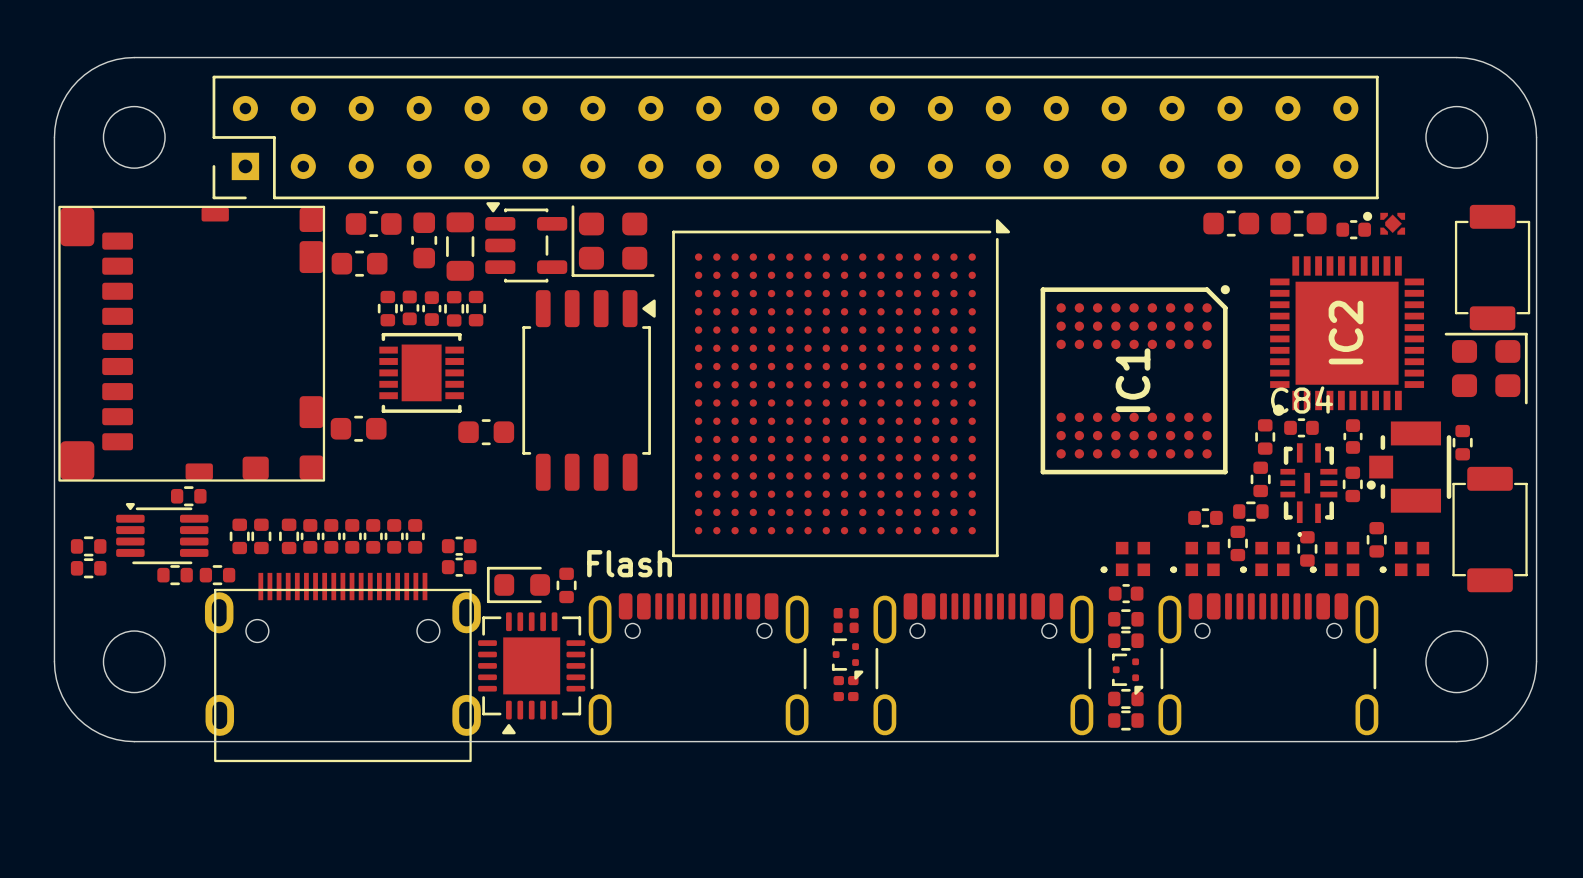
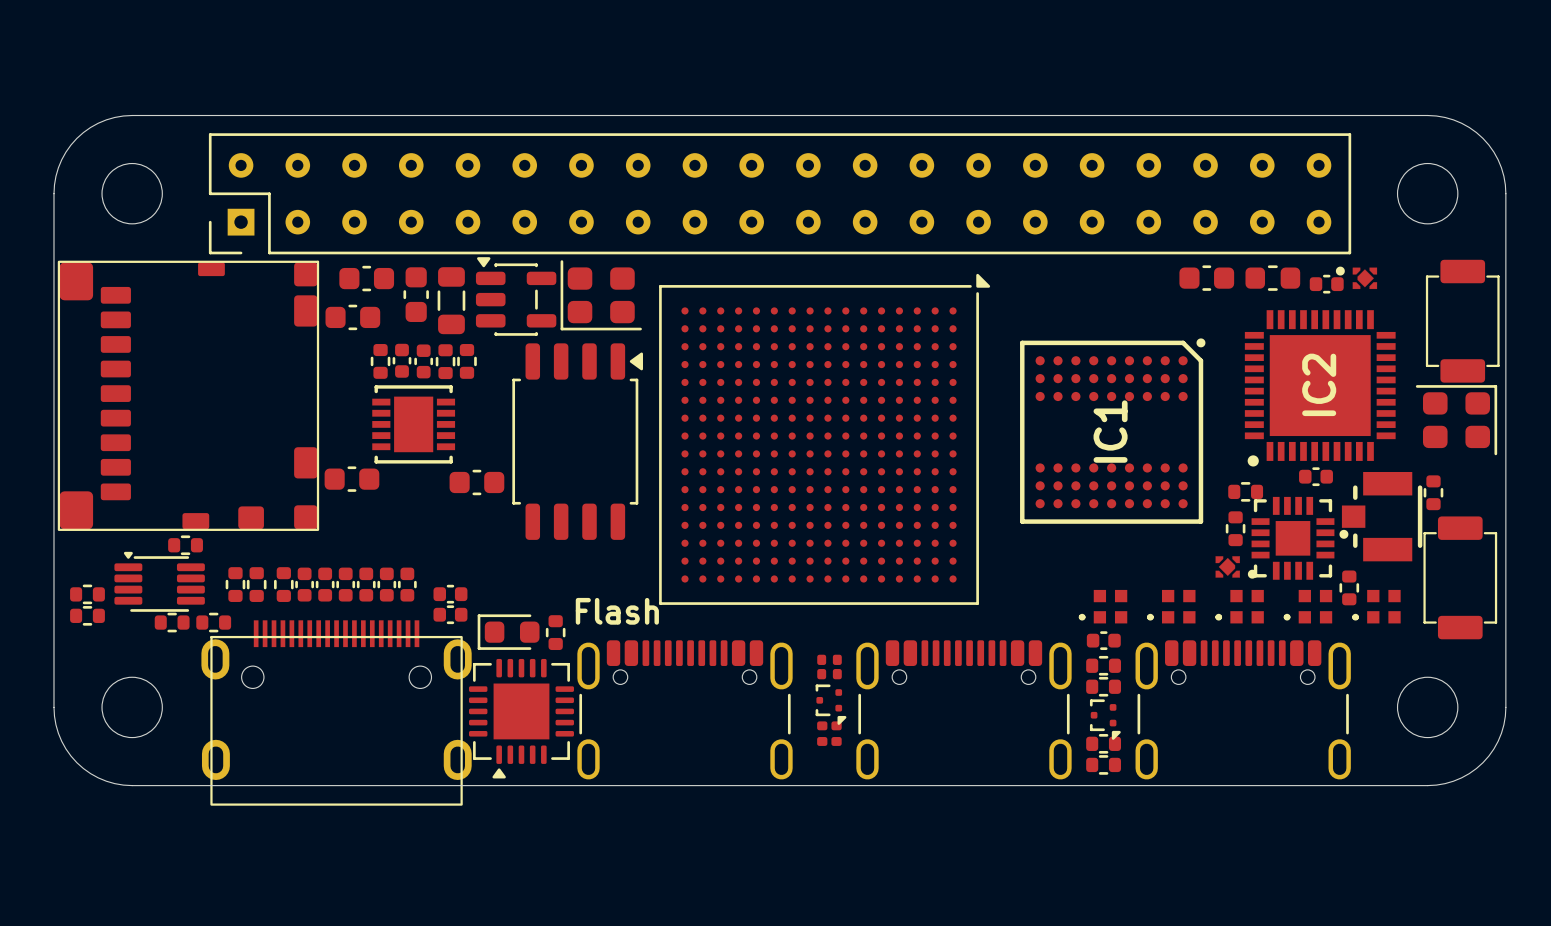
C84: (1301, 427) -> none
part rotation: 0° (1265, 436) -> 90° clockwise (1245, 491)
part rotation: 0° (1353, 436) -> 90° clockwise (1316, 476)
part footprint: [1280, 443, 1338, 537] -> [1251, 496, 1335, 580]
part: (1352, 484) -> none
part footprint: [1233, 501, 1269, 522] -> [1215, 556, 1257, 579]
part: (1205, 517) -> none
part: (1237, 543) -> none
part: (1307, 548) -> none

